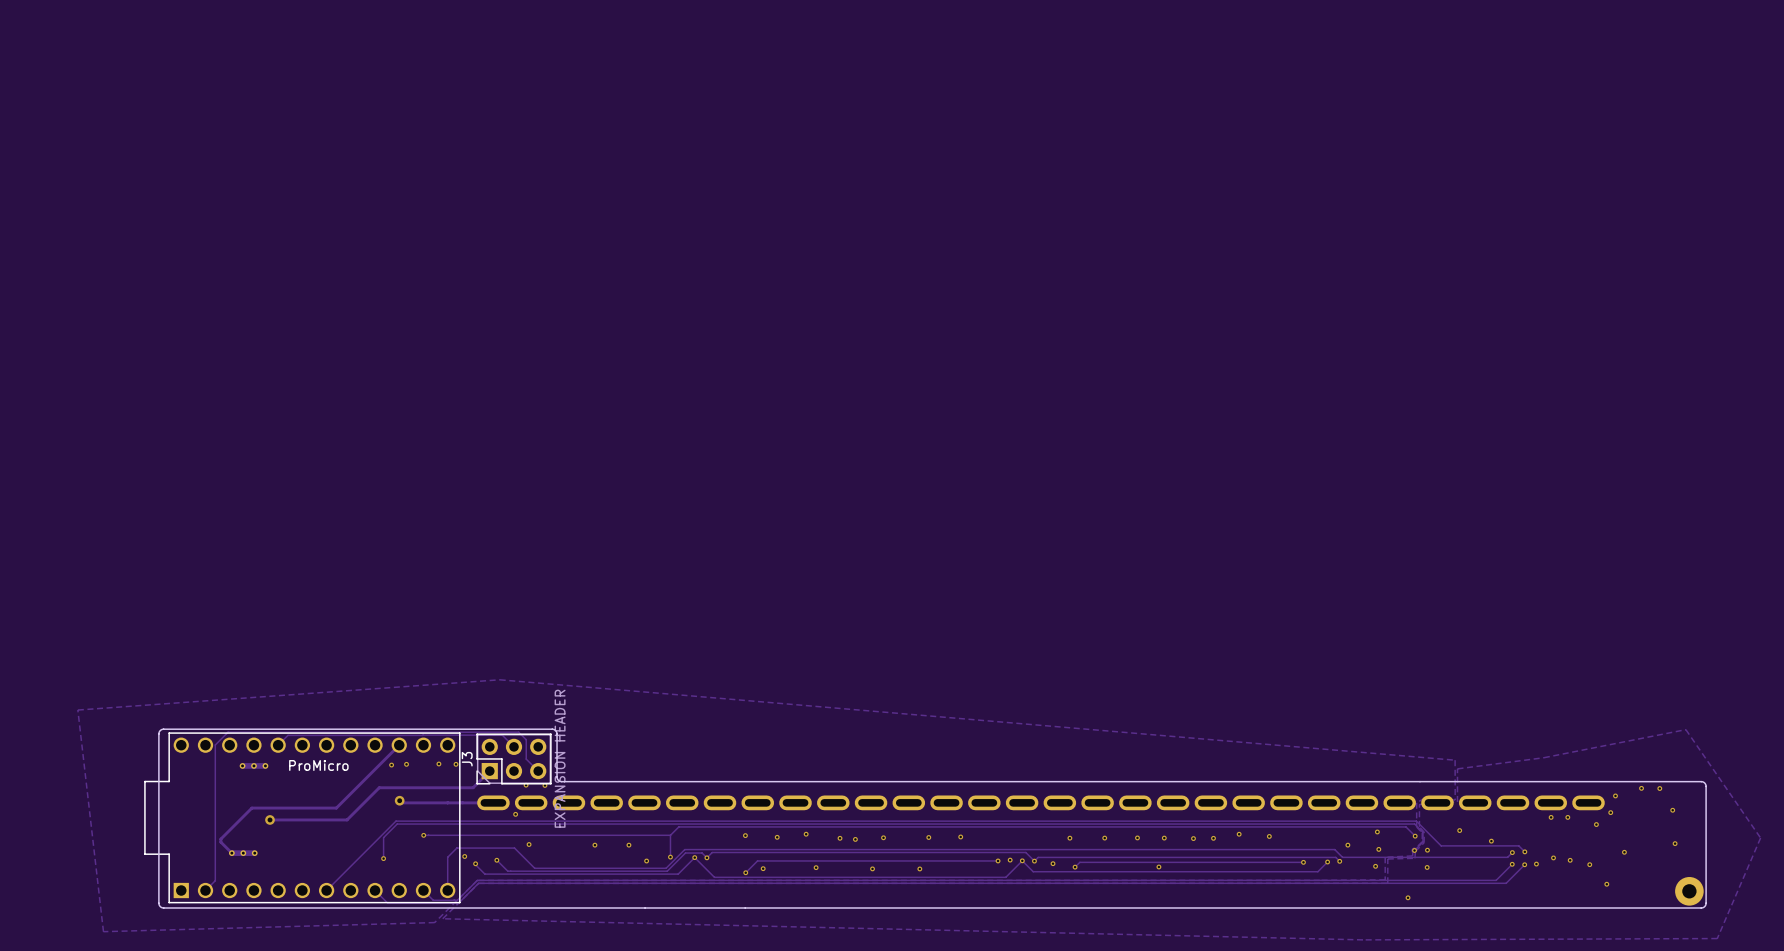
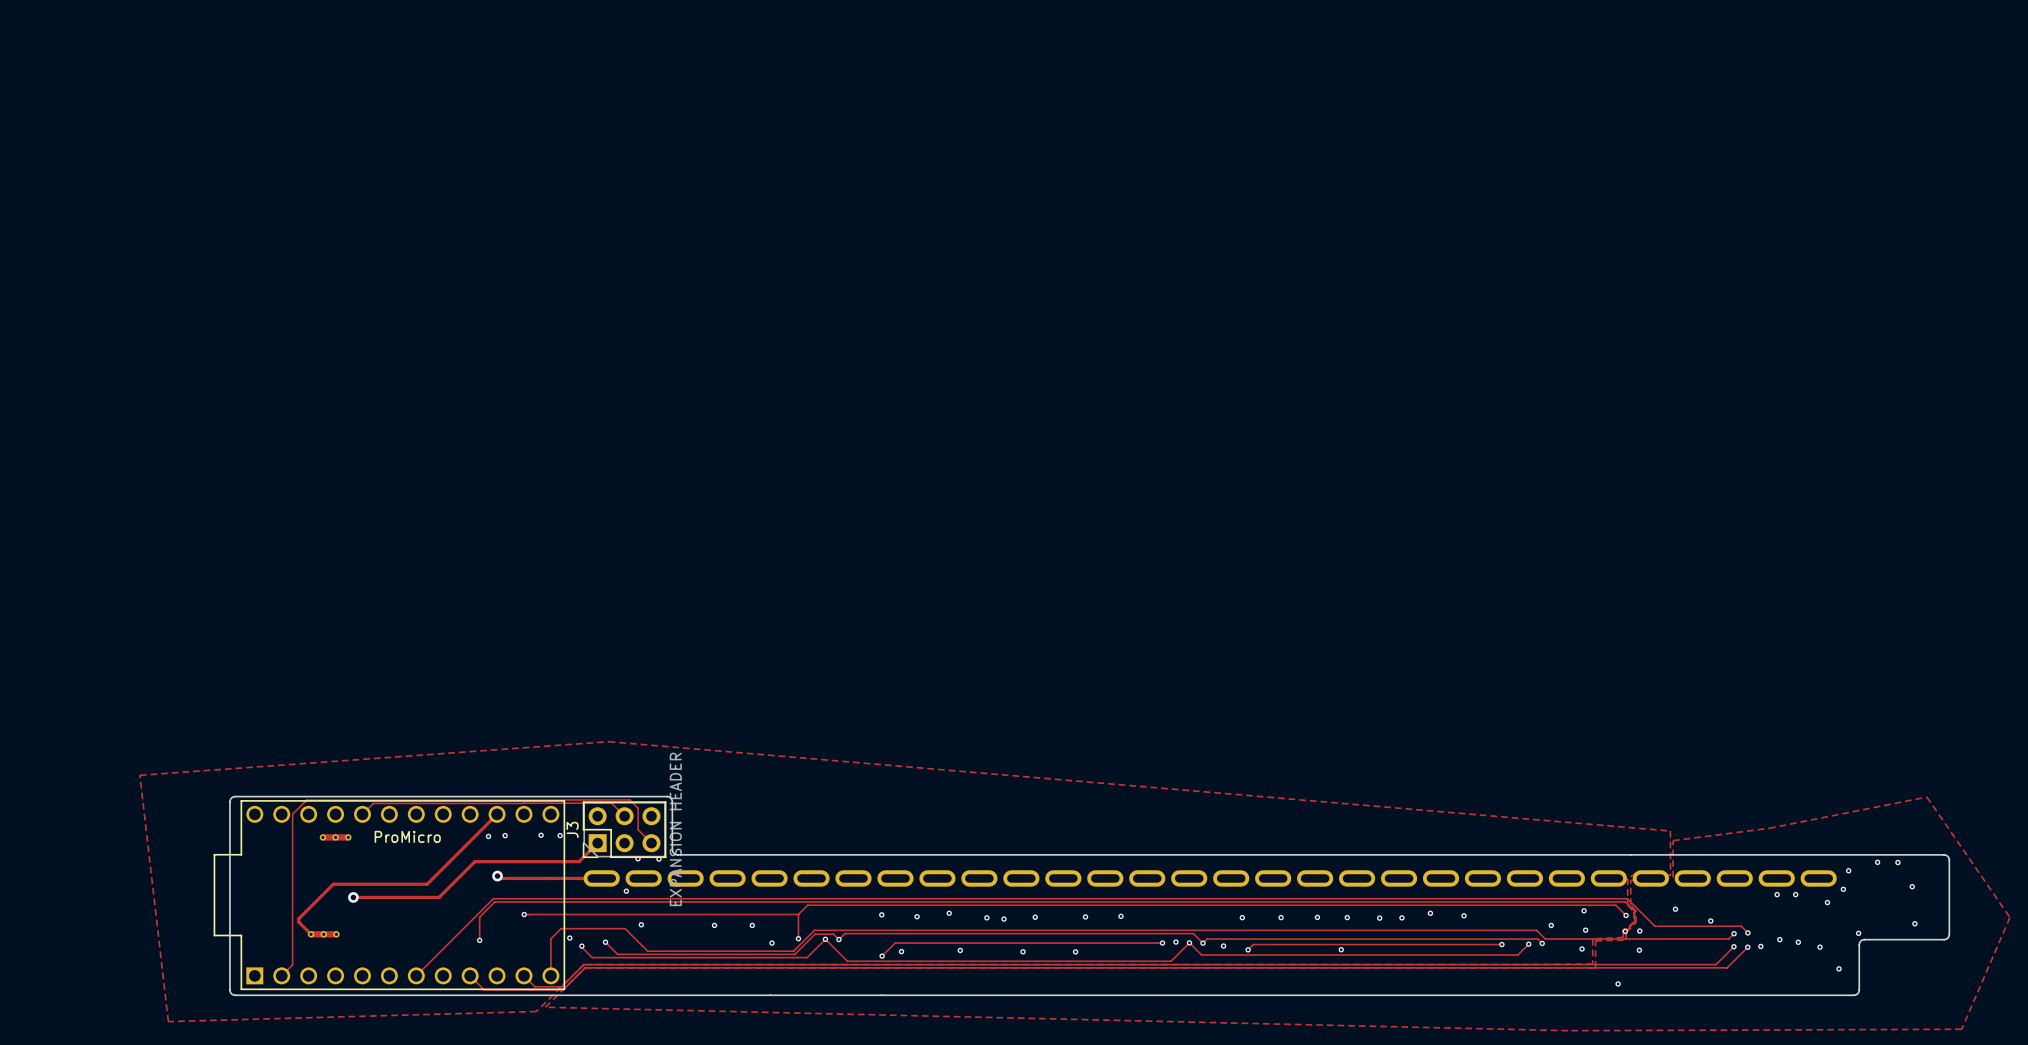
board edge: (1706, 853) (1706, 903) (1703, 907) (1620, 908) -> (1949, 934) (1944, 939) (1861, 940) (1859, 944) (1859, 990) (1853, 995)
part: (1689, 891) -> none

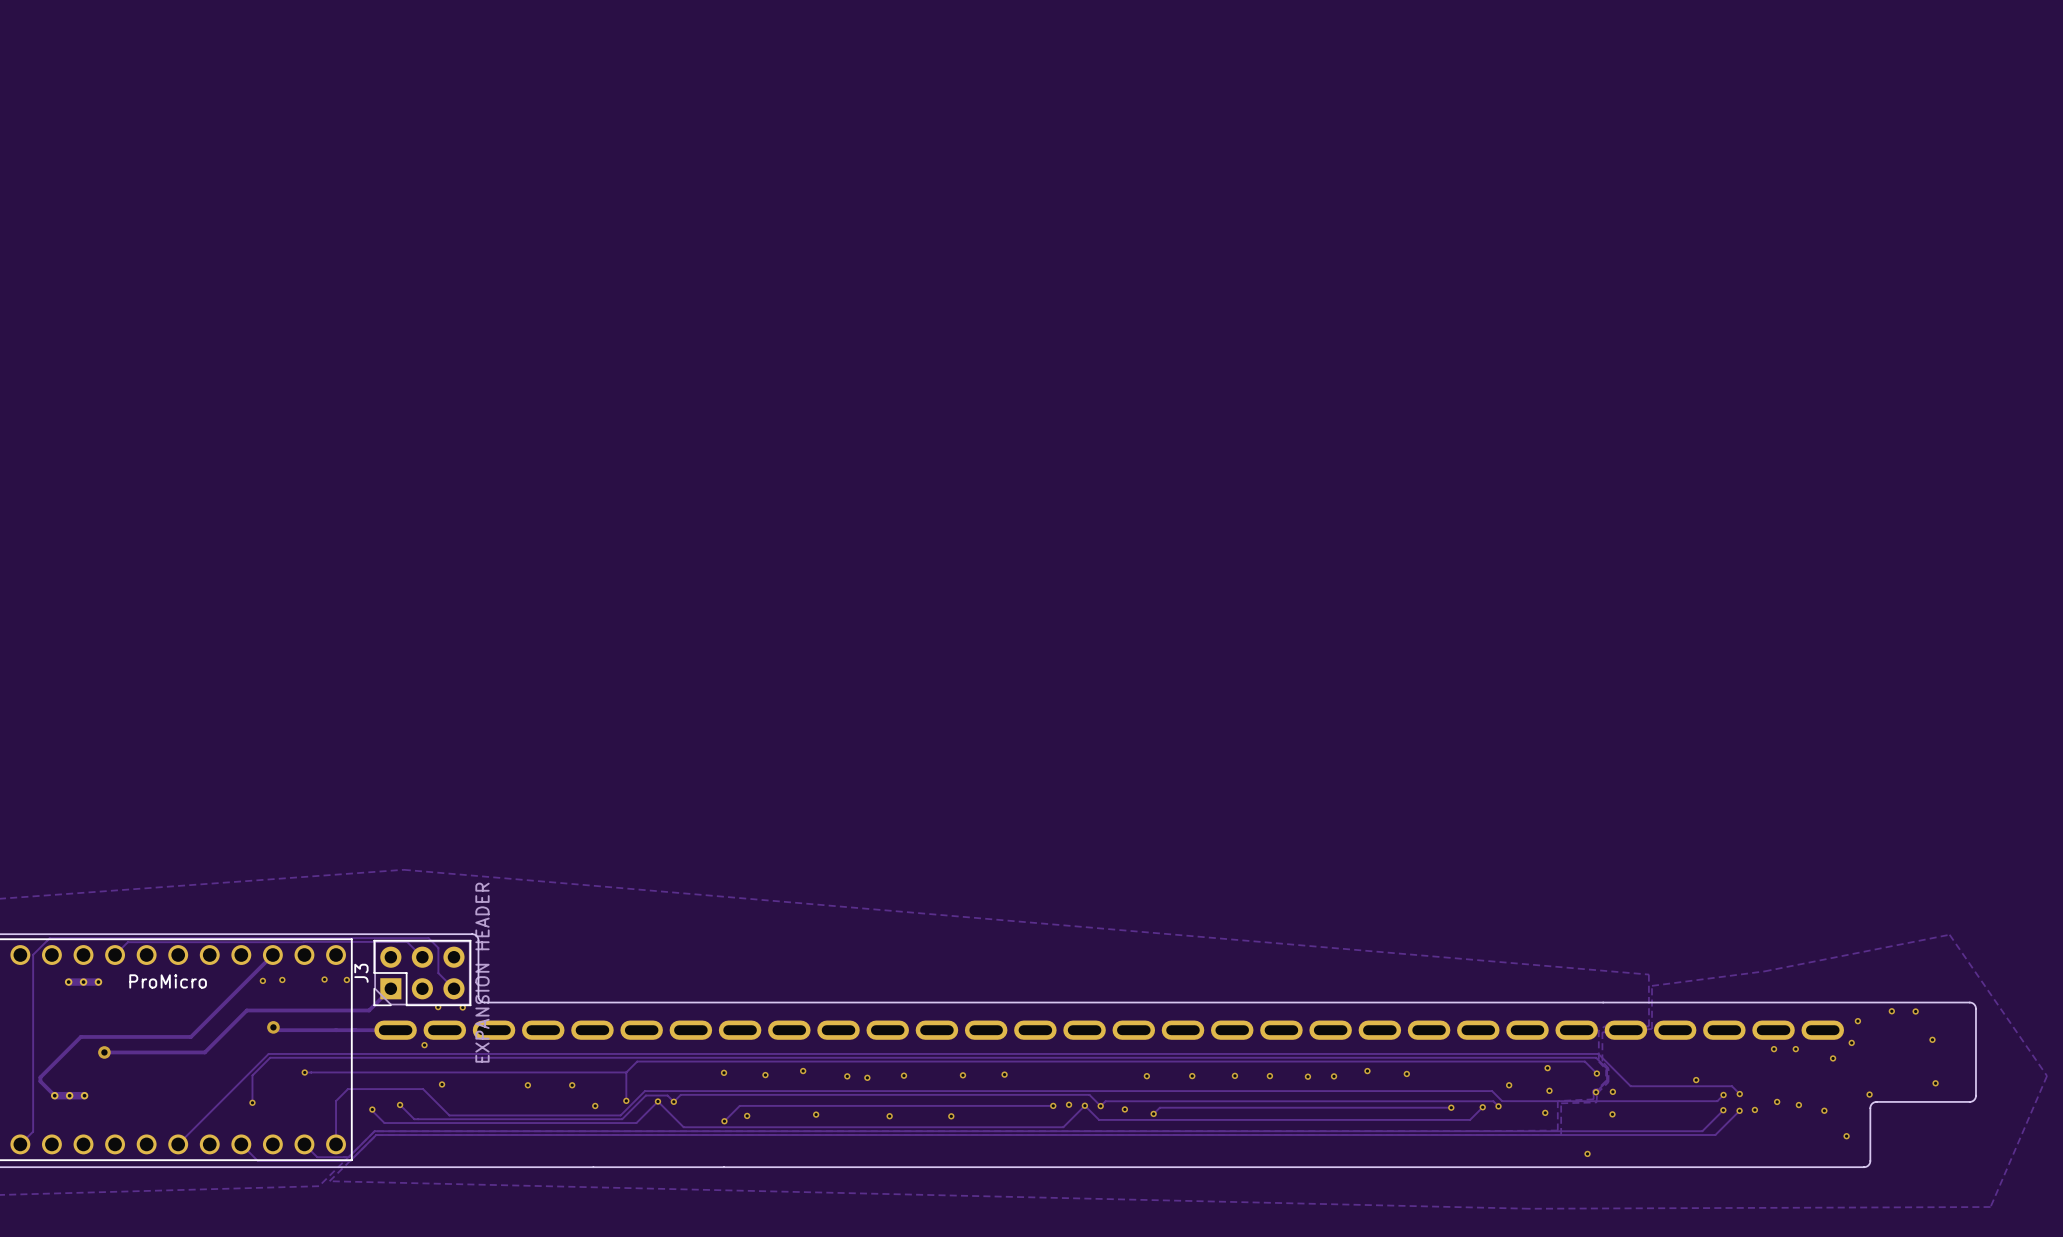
via: (1675, 909) -> none
via: (569, 938) -> none
via: (1341, 949) -> none

